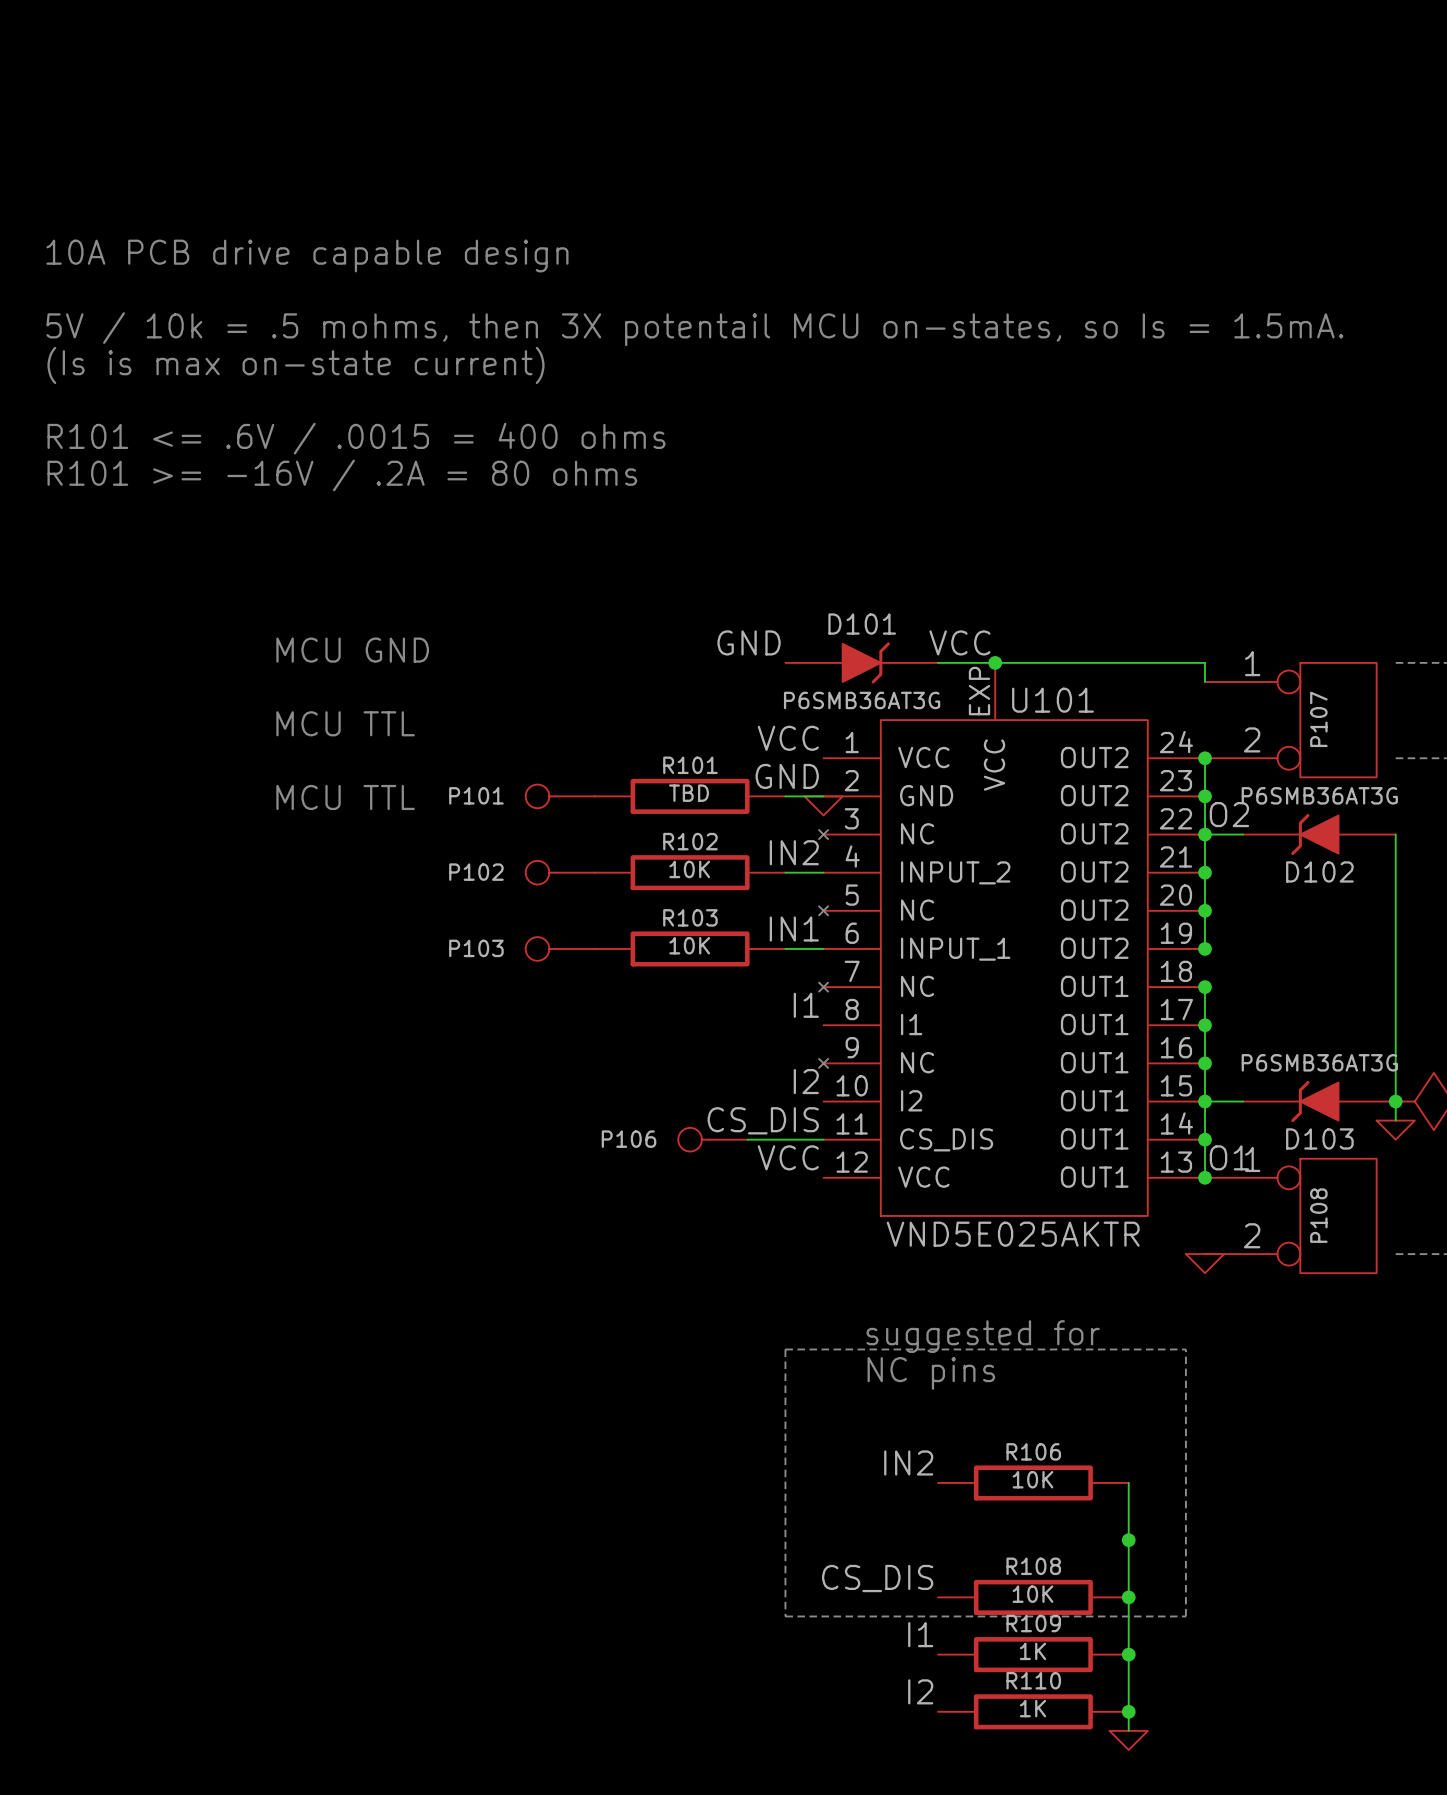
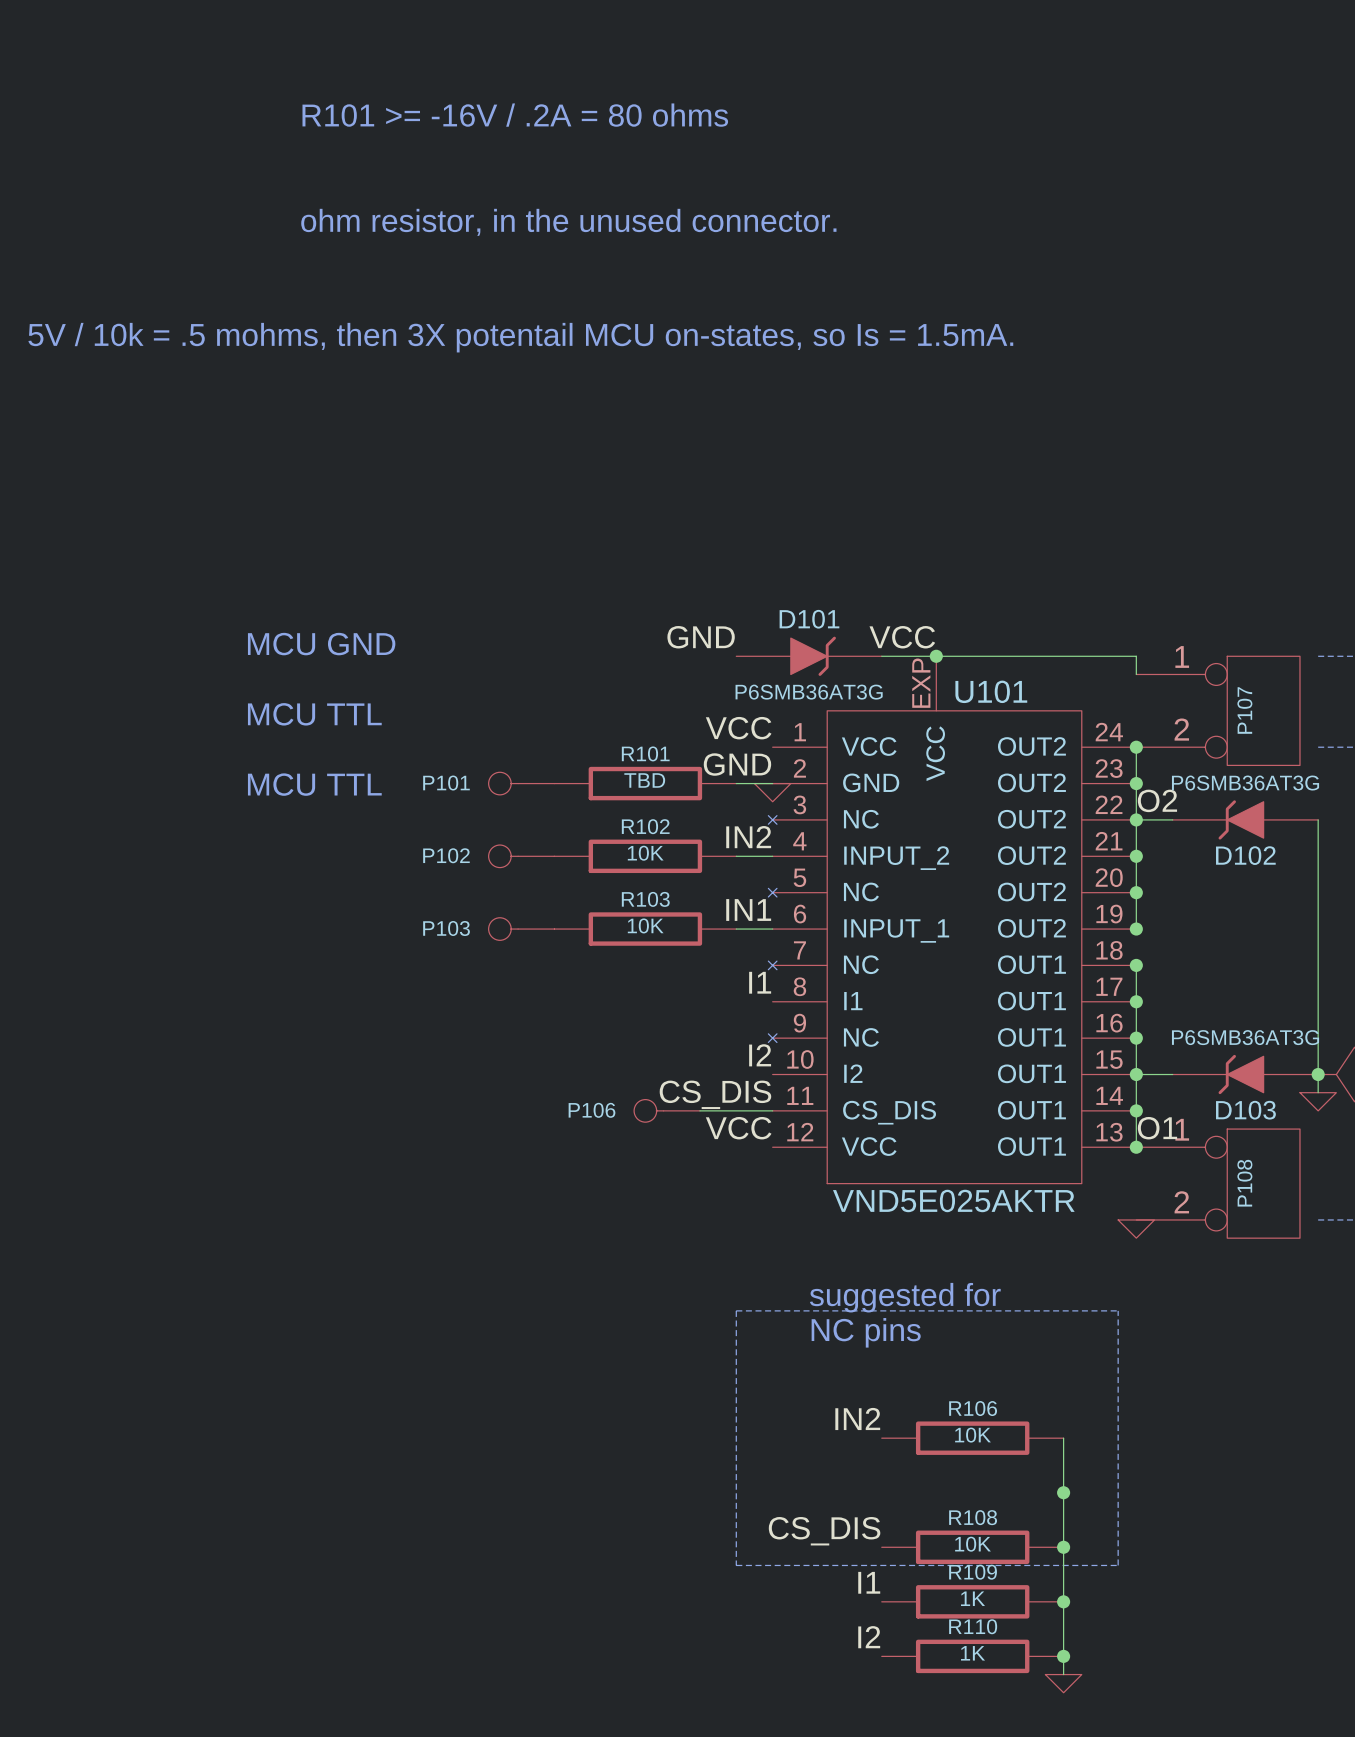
text: none -> R101 >= -16V / .2A = 80 ohms (515, 115)
text: none -> ohm resistor, in the unused connector. (568, 222)
text: 10A PCB drive capable design (307, 256) -> none
text: (Is is max on-state current) (296, 365) -> none
text: R101 <= .6V / .0015 = 400 ohms (356, 438) -> none
text: R101 >= -16V / .2A = 80 ohms (342, 475) -> none

